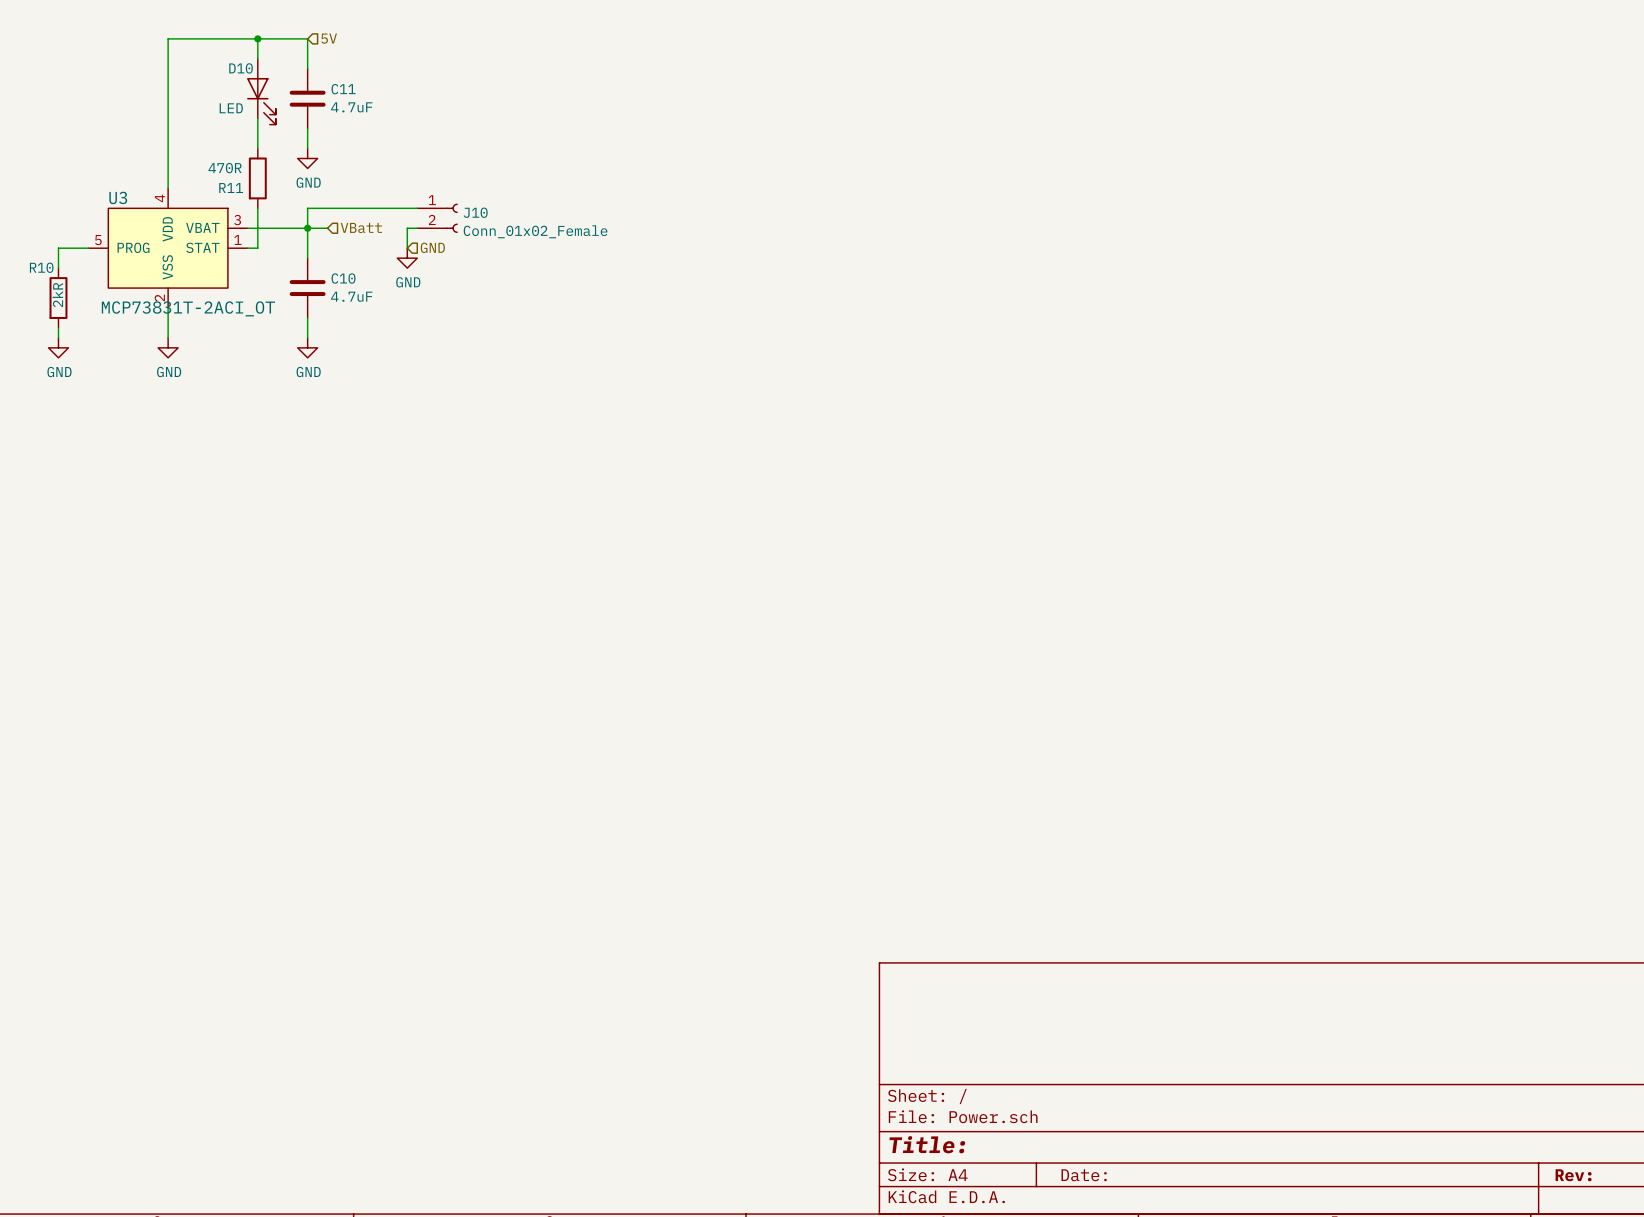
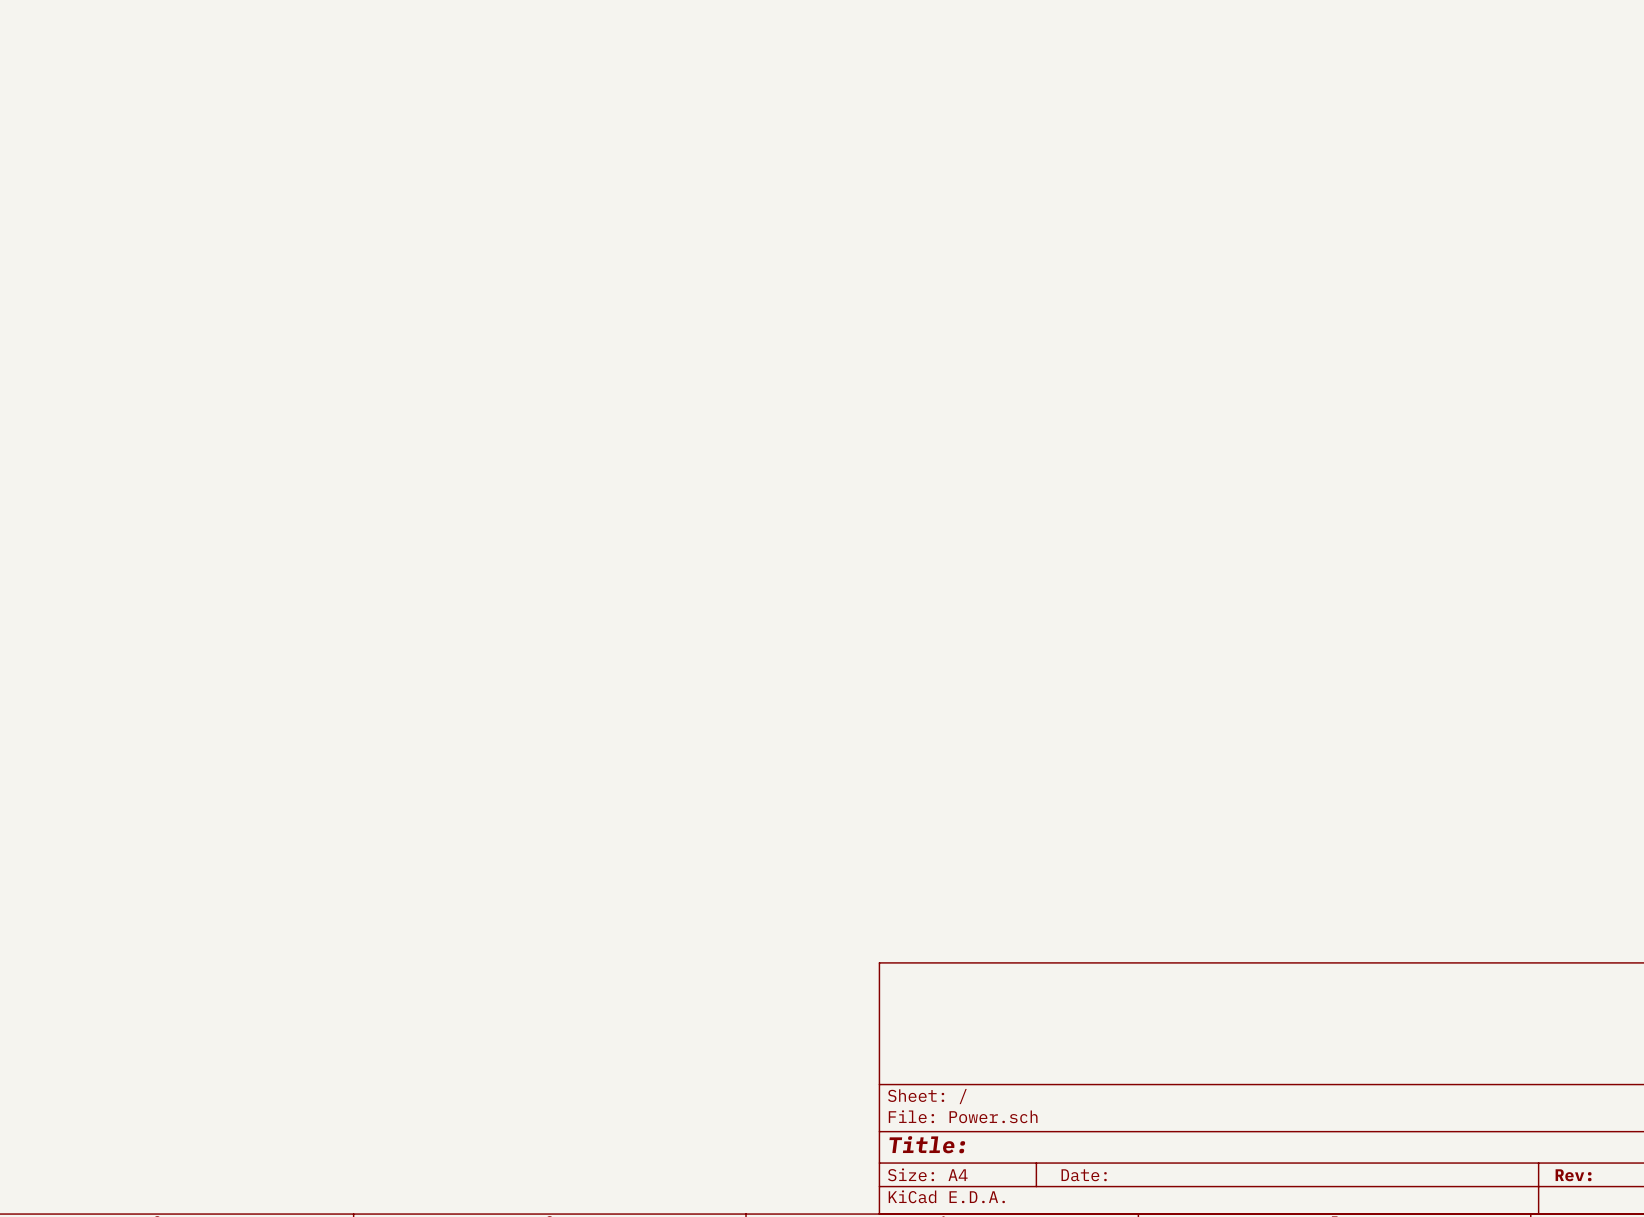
wire: (257, 38) (257, 58) -> none
junction: (257, 38) -> none
hierarchical label: 5V (329, 38) -> none
wire: (307, 68) (307, 38) (168, 38) (168, 188) -> none
D10: LED (261, 91) -> none
C11: 4.7uF (307, 98) -> none
wire: (257, 118) (257, 148) -> none
wire: (307, 128) (307, 148) -> none
power symbol: GND (307, 158) -> none
R11: 470R (257, 178) -> none
wire: (257, 208) (257, 248) (247, 248) -> none
wire: (417, 208) (307, 208) (307, 258) -> none
J10: Conn_01x02_Female (437, 218) -> none
hierarchical label: VBatt (361, 227) -> none
wire: (247, 228) (327, 228) -> none
junction: (307, 228) -> none
wire: (417, 228) (407, 228) (407, 248) -> none
hierarchical label: GND (432, 247) -> none
wire: (88, 248) (58, 248) (58, 268) -> none
U3: MCP73831T-2ACI_OT (168, 248) -> none
power symbol: GND (407, 258) -> none
C10: 4.7uF (307, 288) -> none
R10: 2kR (58, 298) -> none
wire: (168, 307) (168, 337) -> none
wire: (307, 317) (307, 337) -> none
wire: (58, 327) (58, 337) -> none
power symbol: GND (58, 347) -> none
power symbol: GND (168, 347) -> none
power symbol: GND (307, 347) -> none

